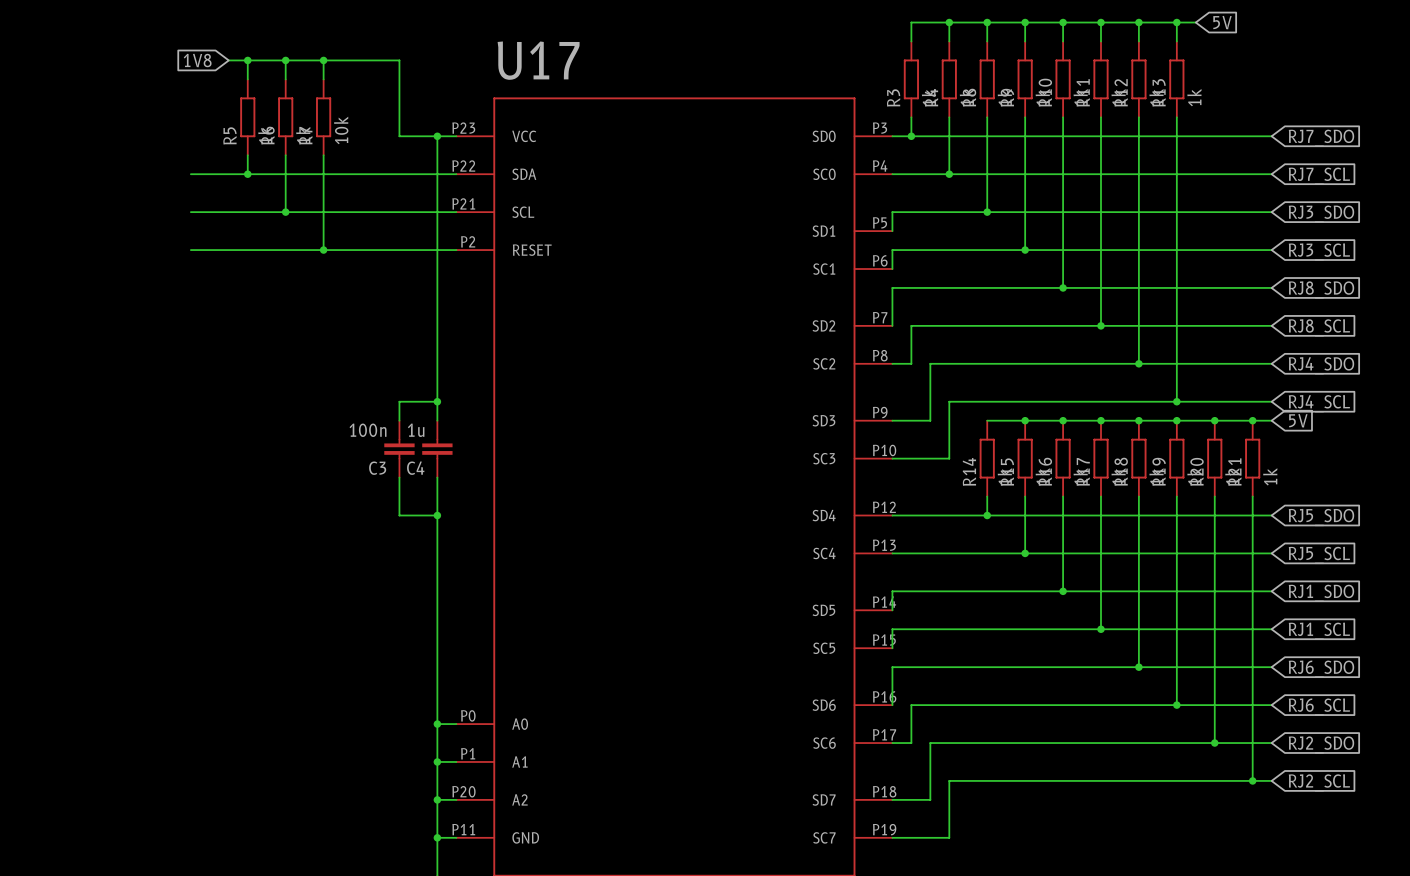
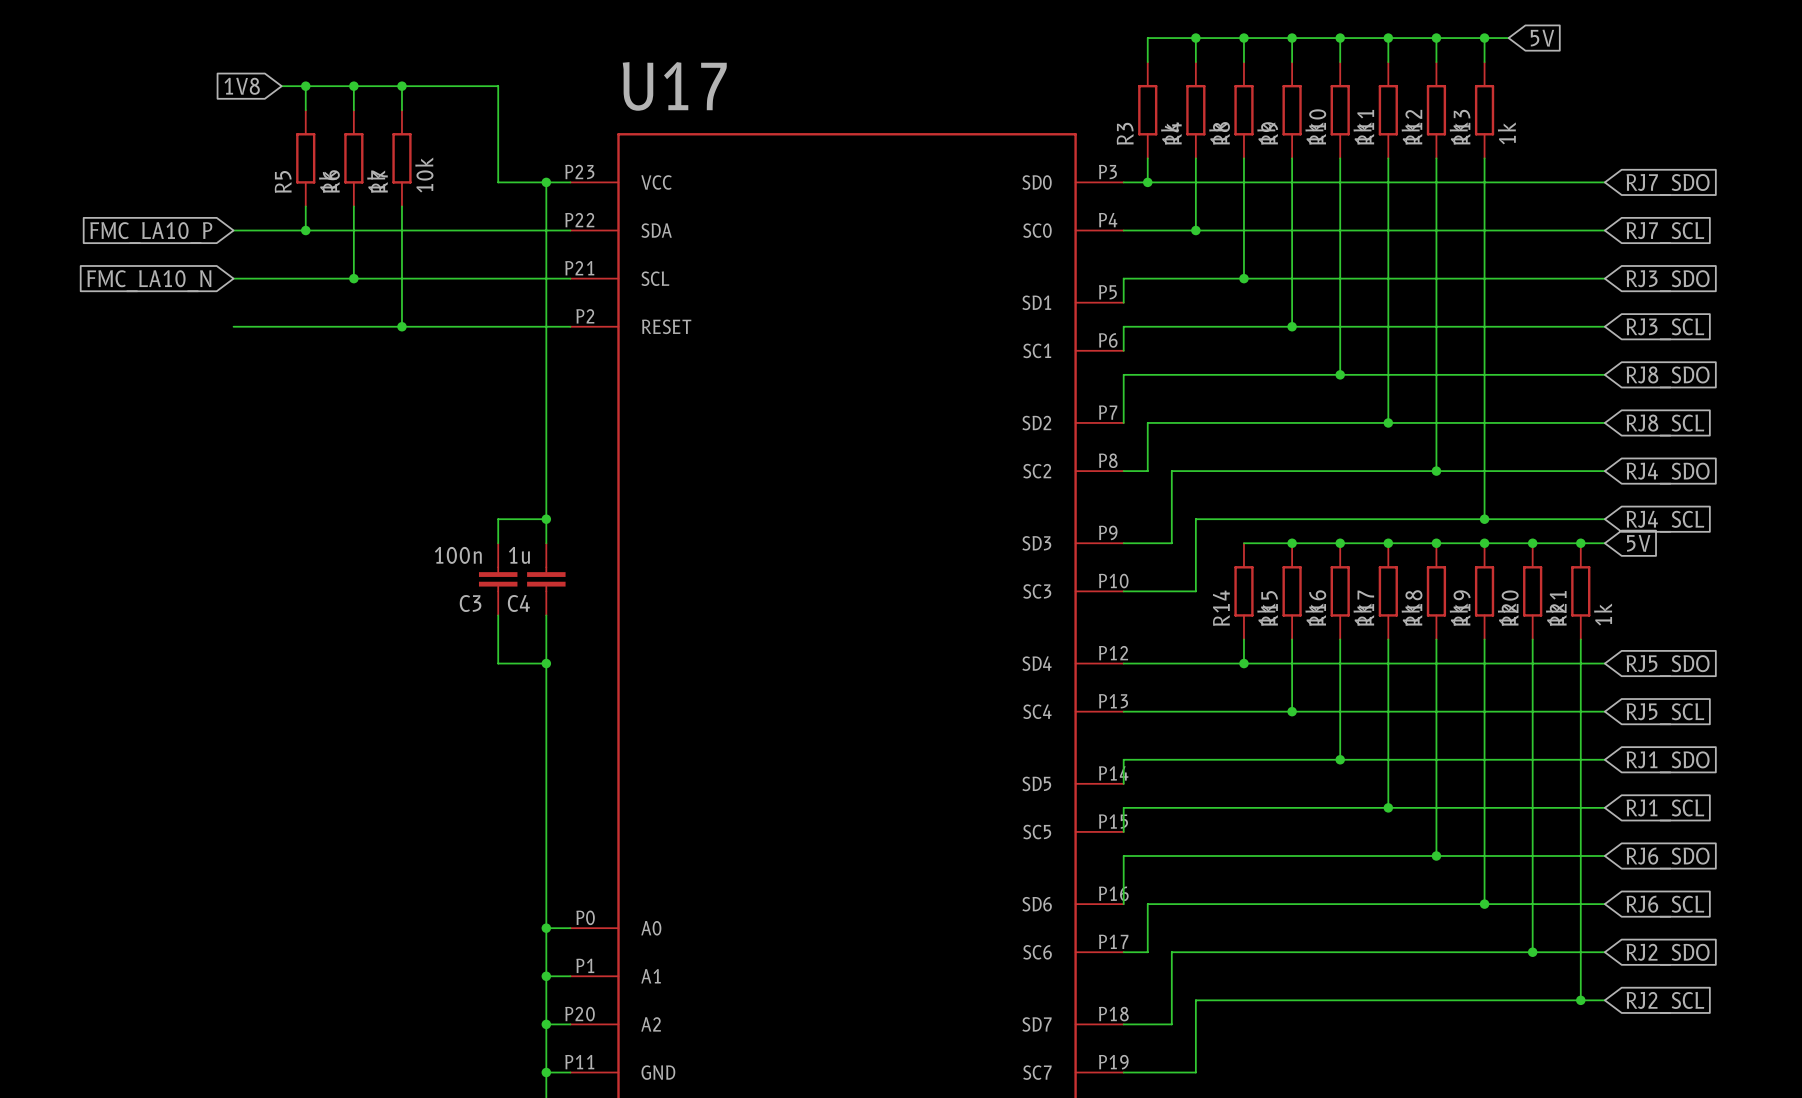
global label: none -> FMC_LA10_P (151, 233)
global label: none -> FMC_LA10_N (149, 281)

